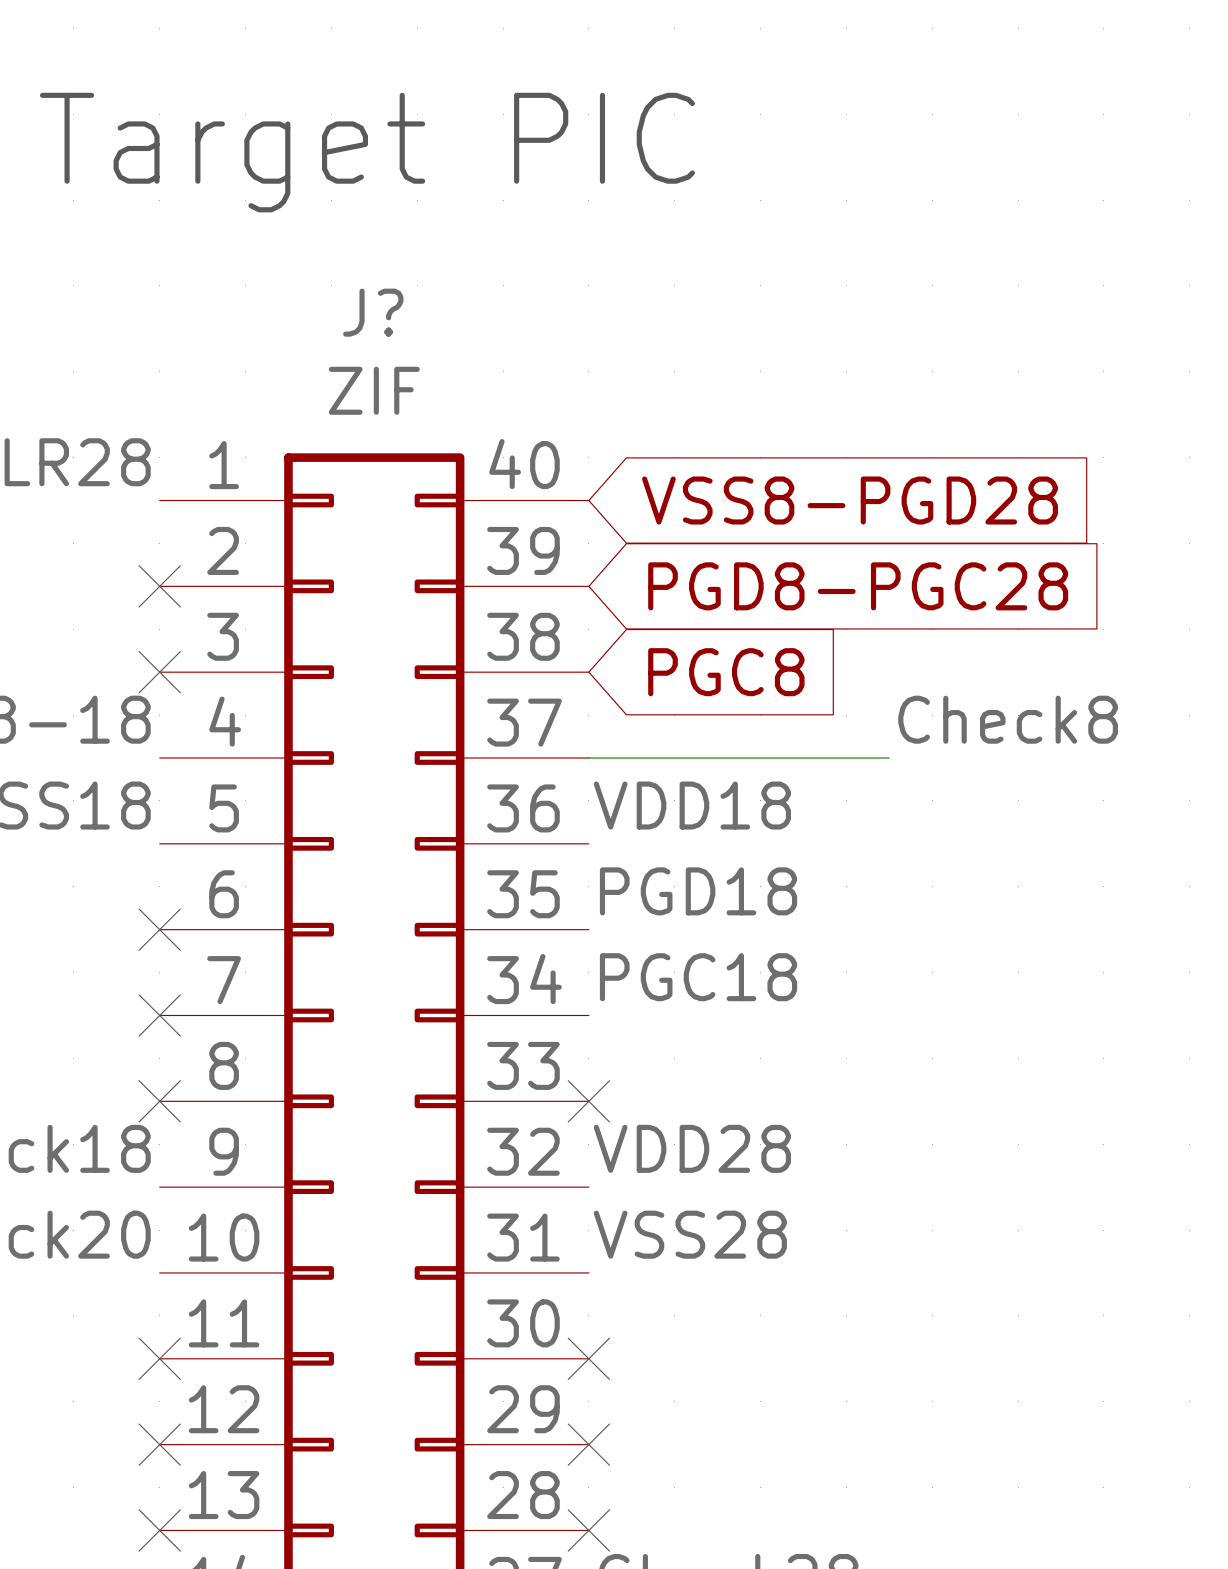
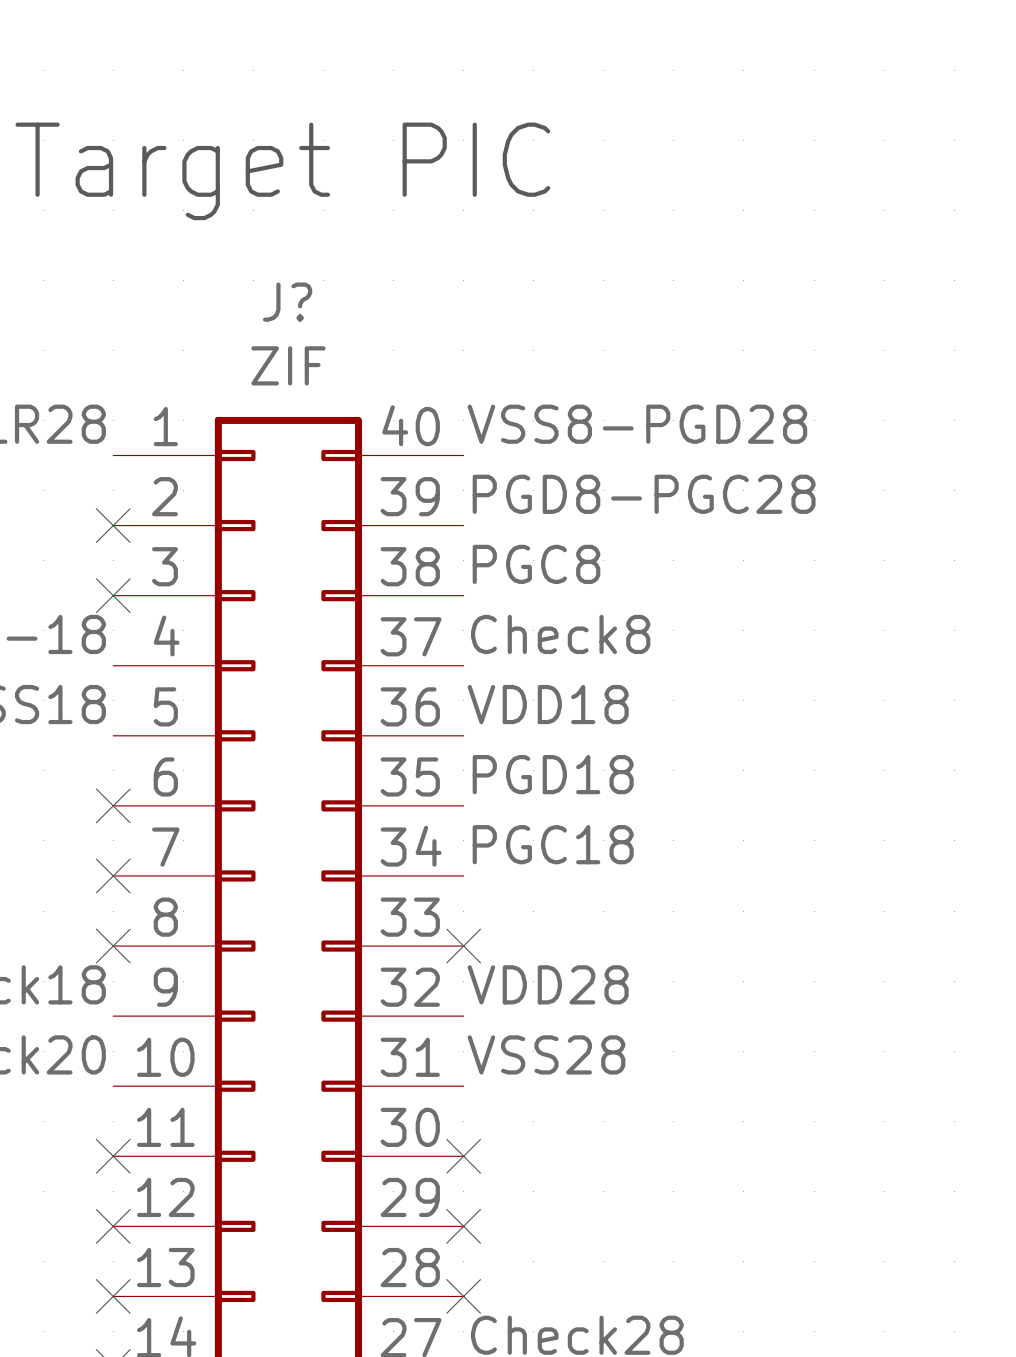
label: none -> VSS8-PGD28 (637, 424)
global label: VSS8-PGD28 (849, 500) -> none
label: none -> PGD8-PGC28 (644, 494)
global label: PGD8-PGC28 (858, 586) -> none
label: none -> PGC8 (536, 564)
global label: PGC8 (726, 672) -> none
label position: Check8 (1008, 719) -> Check8 (560, 634)
wire: (588, 758) (889, 758) -> none

